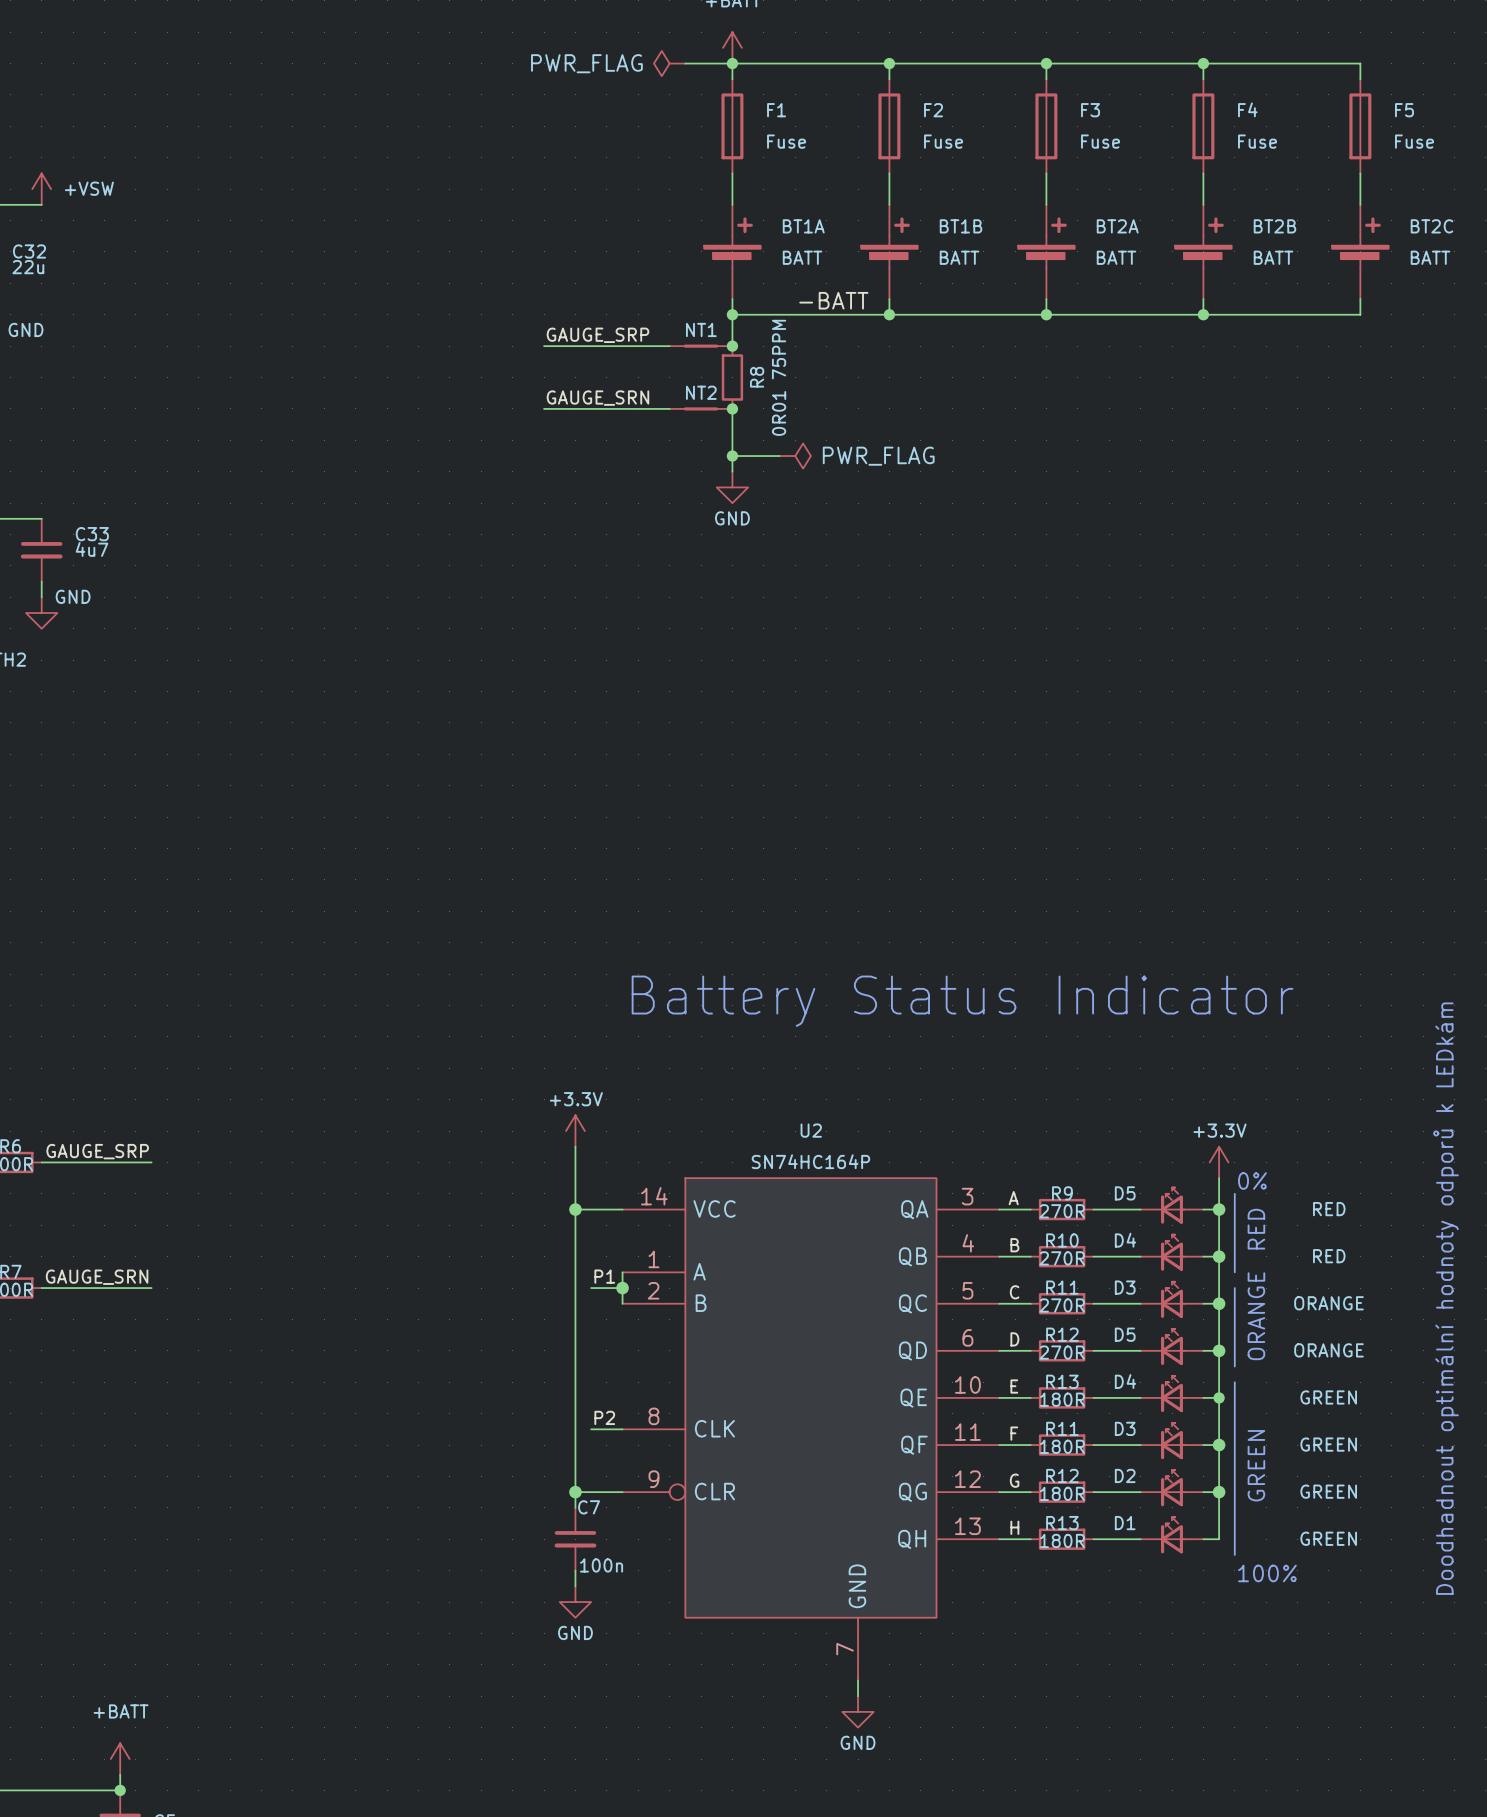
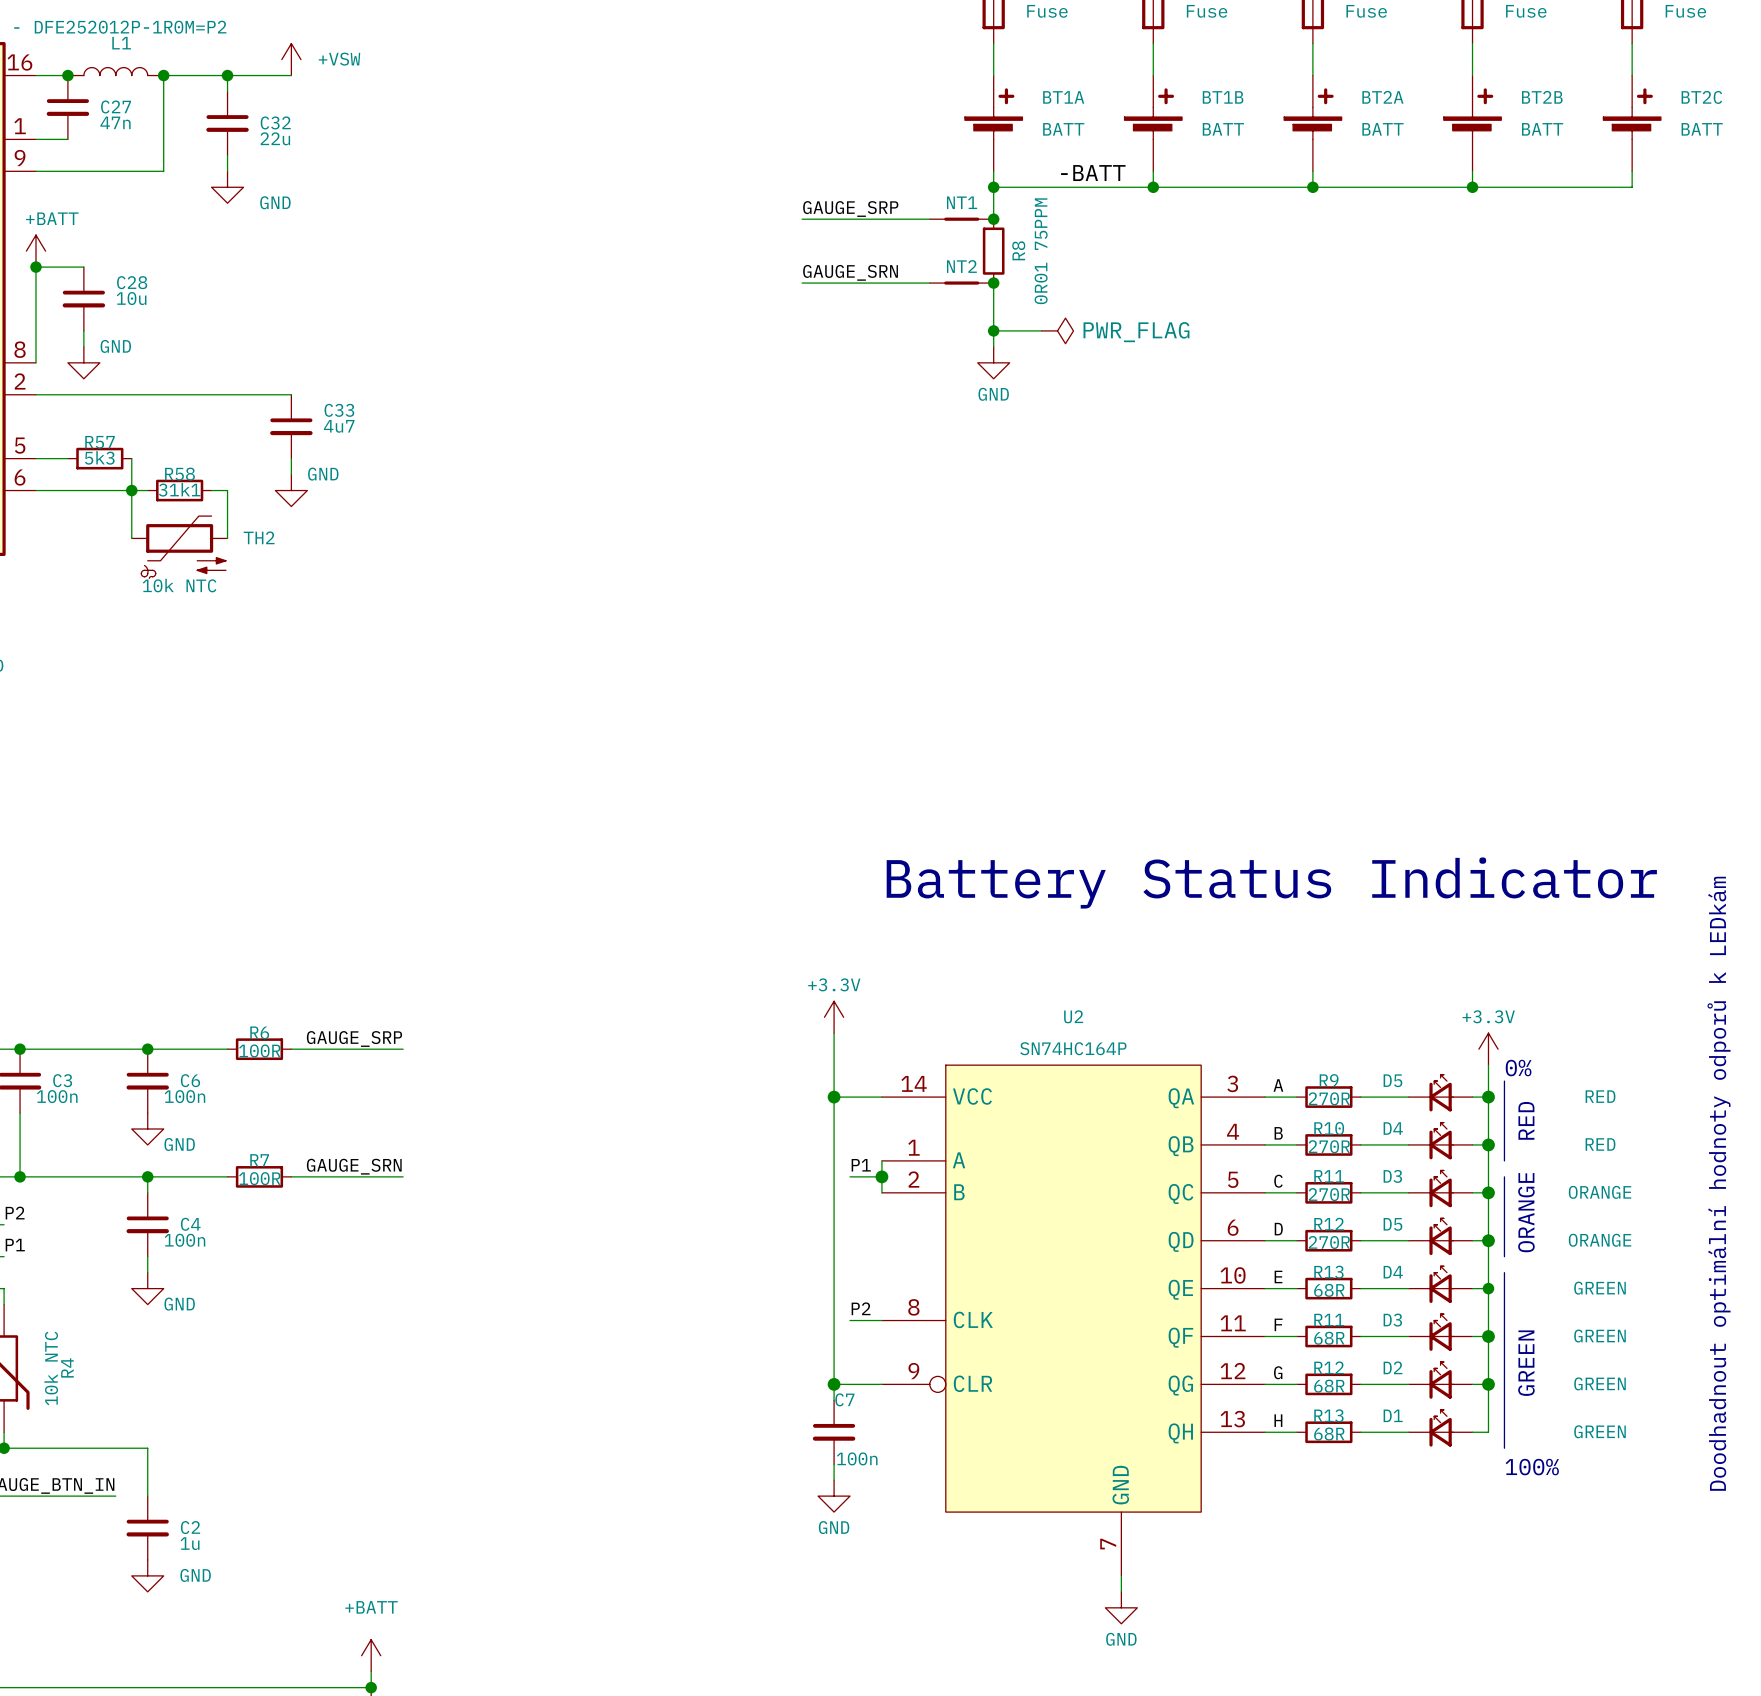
R13 value: 180R (1062, 1399) -> 68R (1329, 1290)
R11 value: 180R (1062, 1446) -> 68R (1329, 1338)
R12 value: 180R (1062, 1493) -> 68R (1329, 1386)
R13 value: 180R (1062, 1540) -> 68R (1329, 1434)

